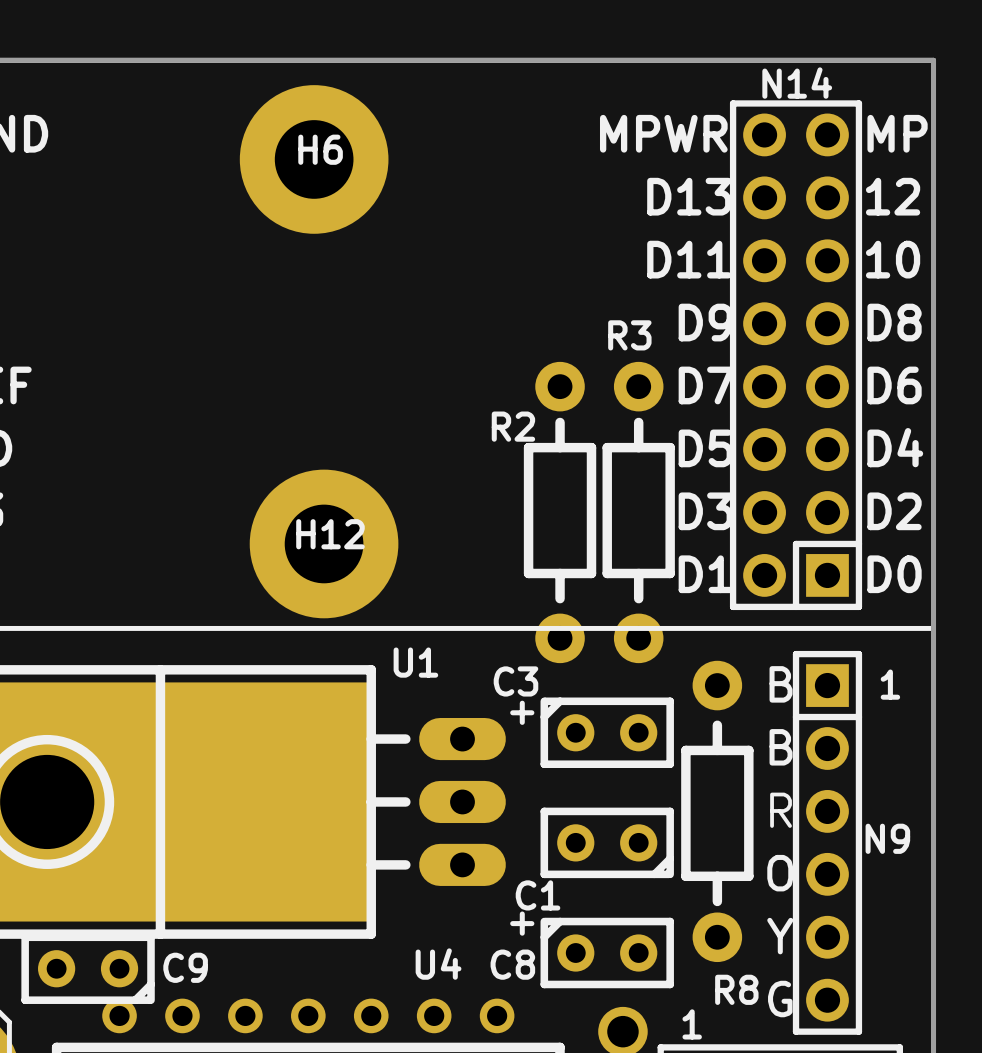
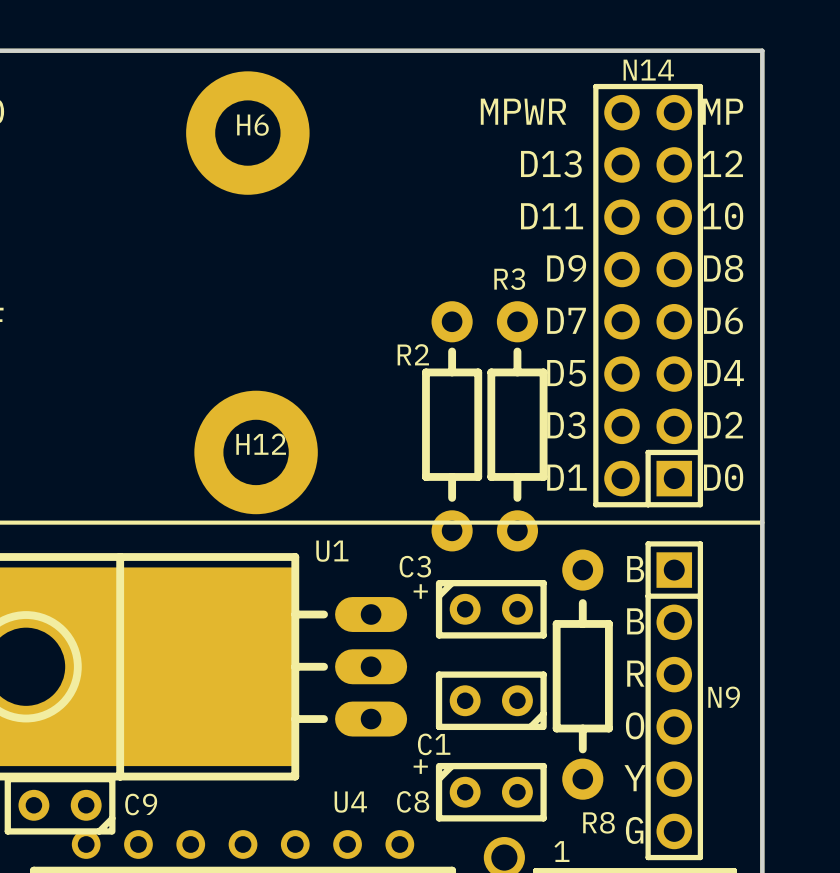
text: 1 (890, 684) -> none

